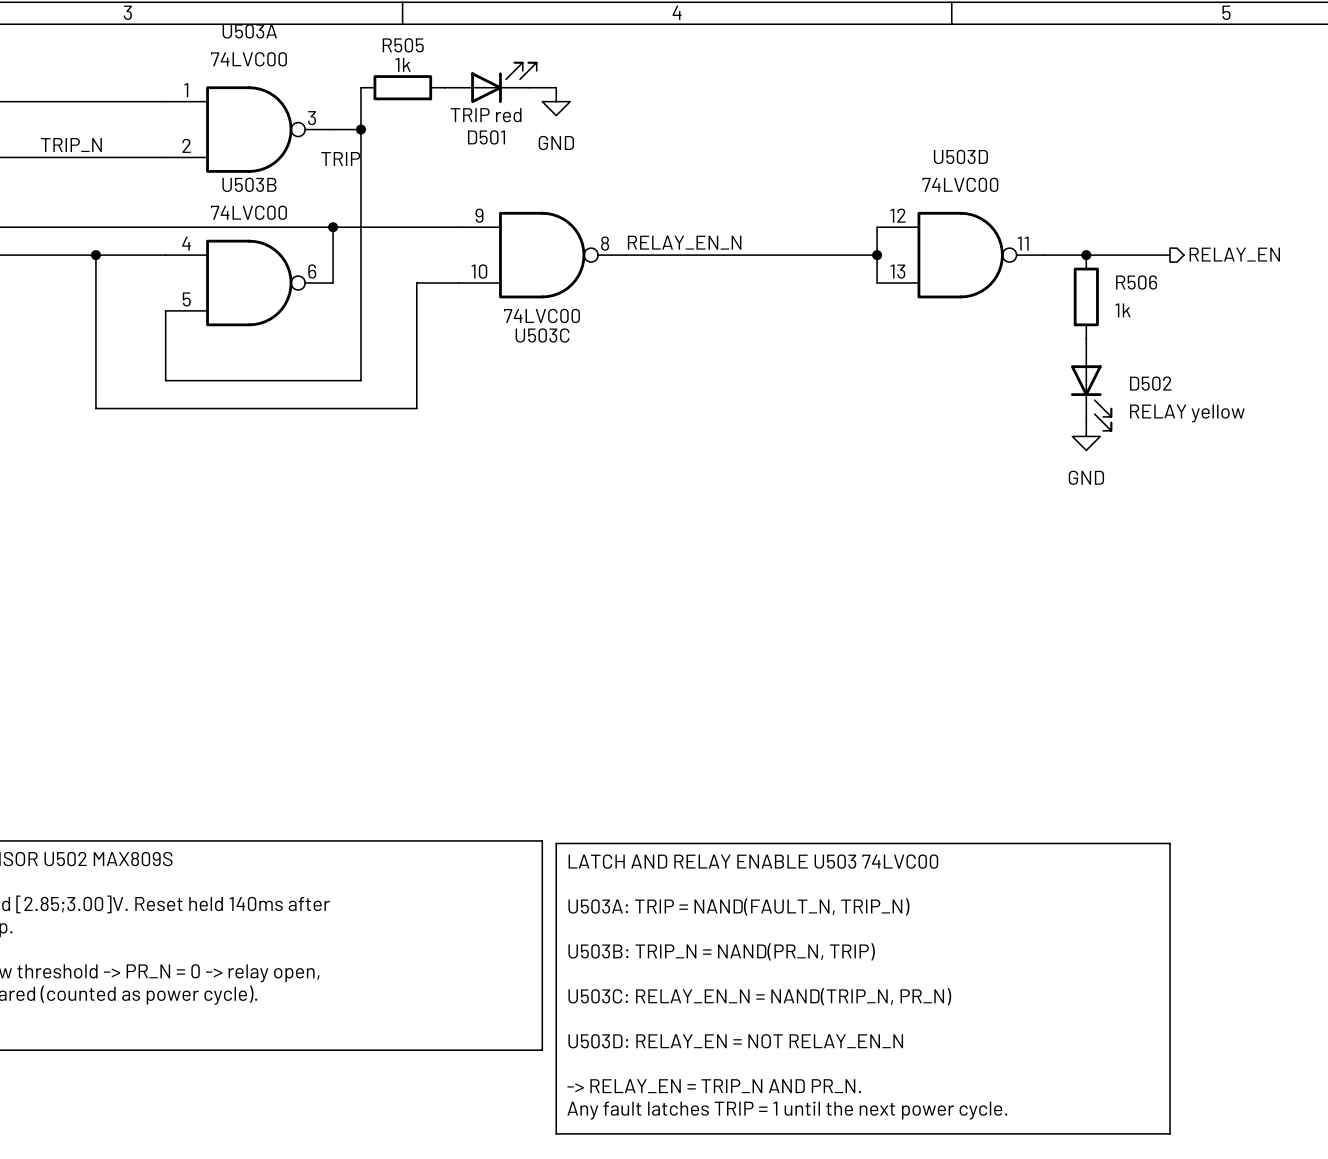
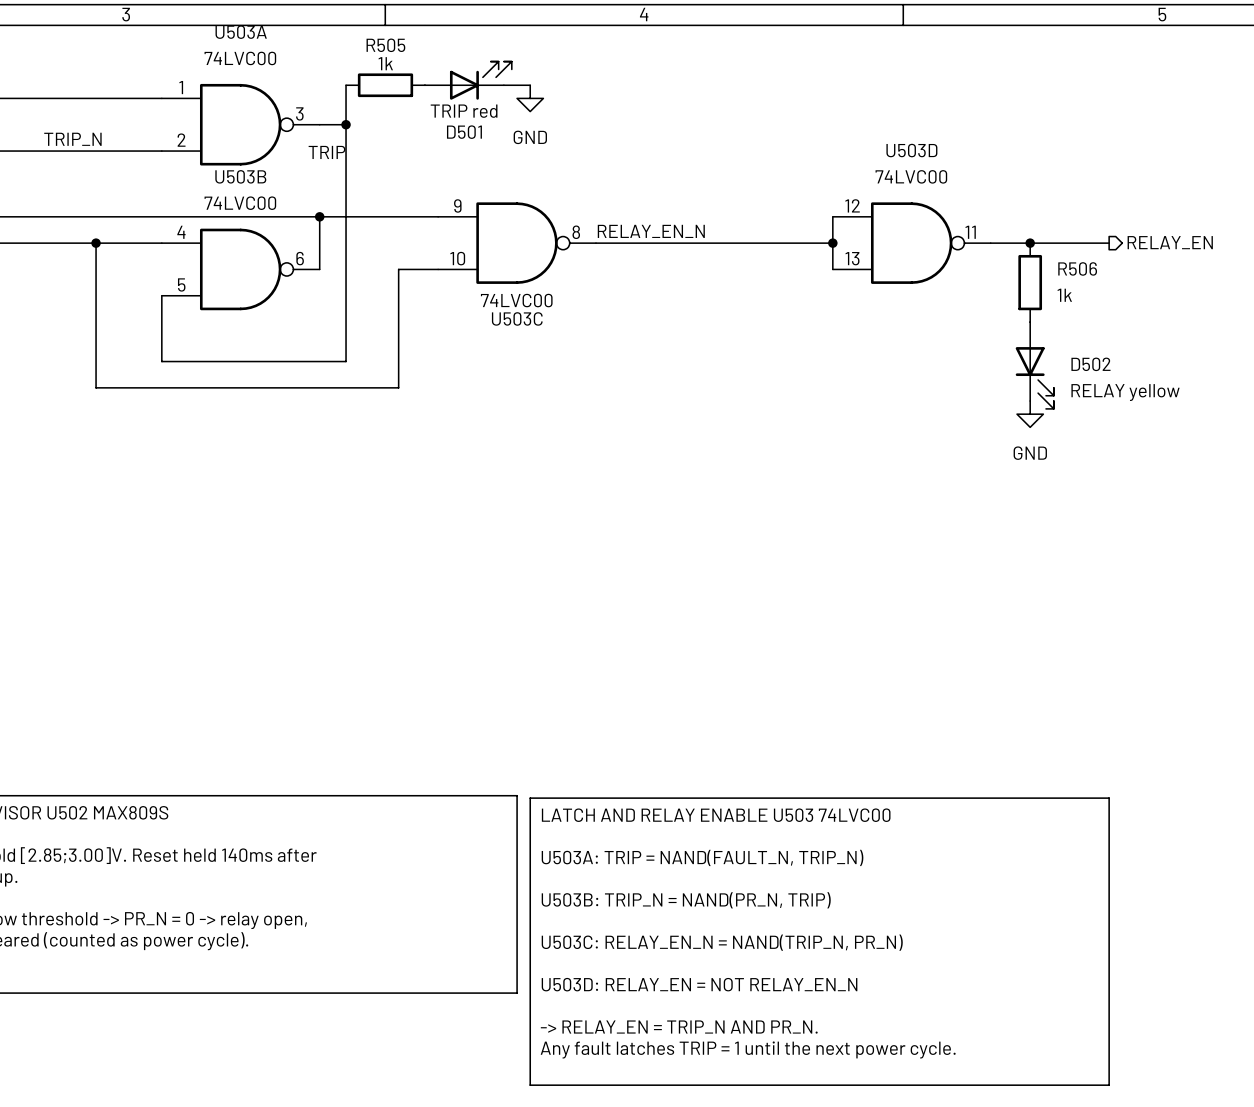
line: (556, 1133) (1170, 1133) -> (530, 1072) (530, 1085) (1109, 1085) (1109, 1072)

